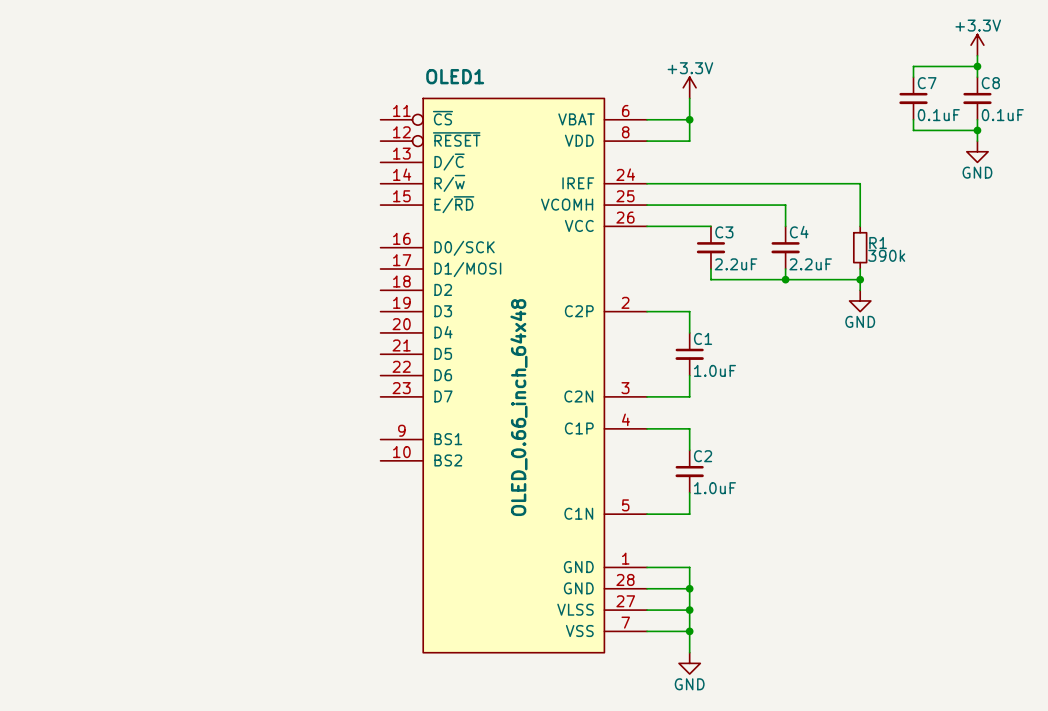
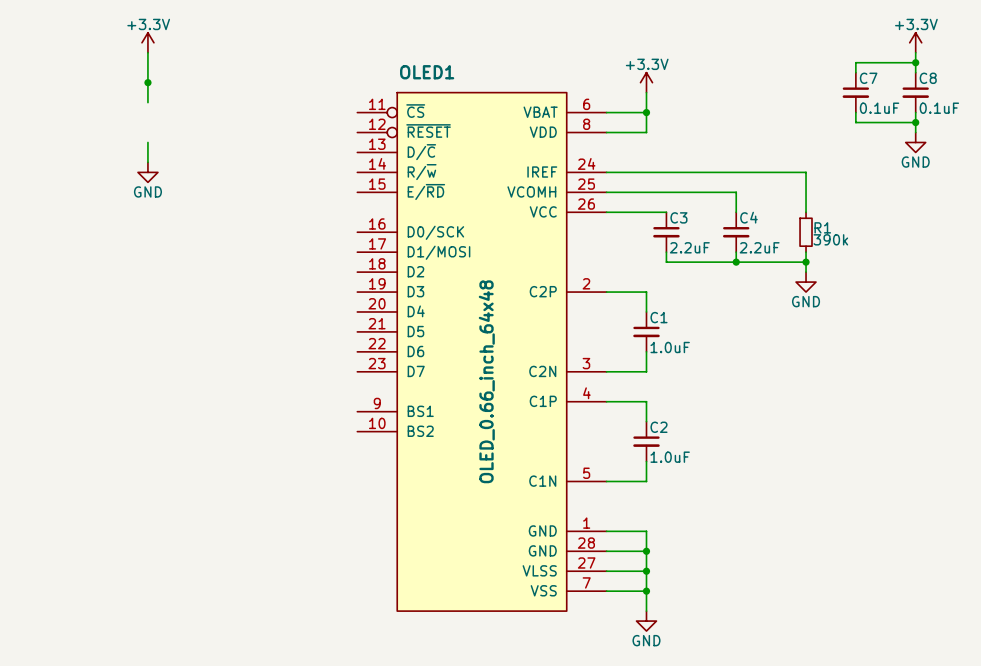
power symbol: none -> +3.3V (147, 42)
wire: none -> (147, 52) (147, 102)
junction: none -> (147, 82)
wire: none -> (147, 142) (147, 162)
power symbol: none -> GND (147, 172)

